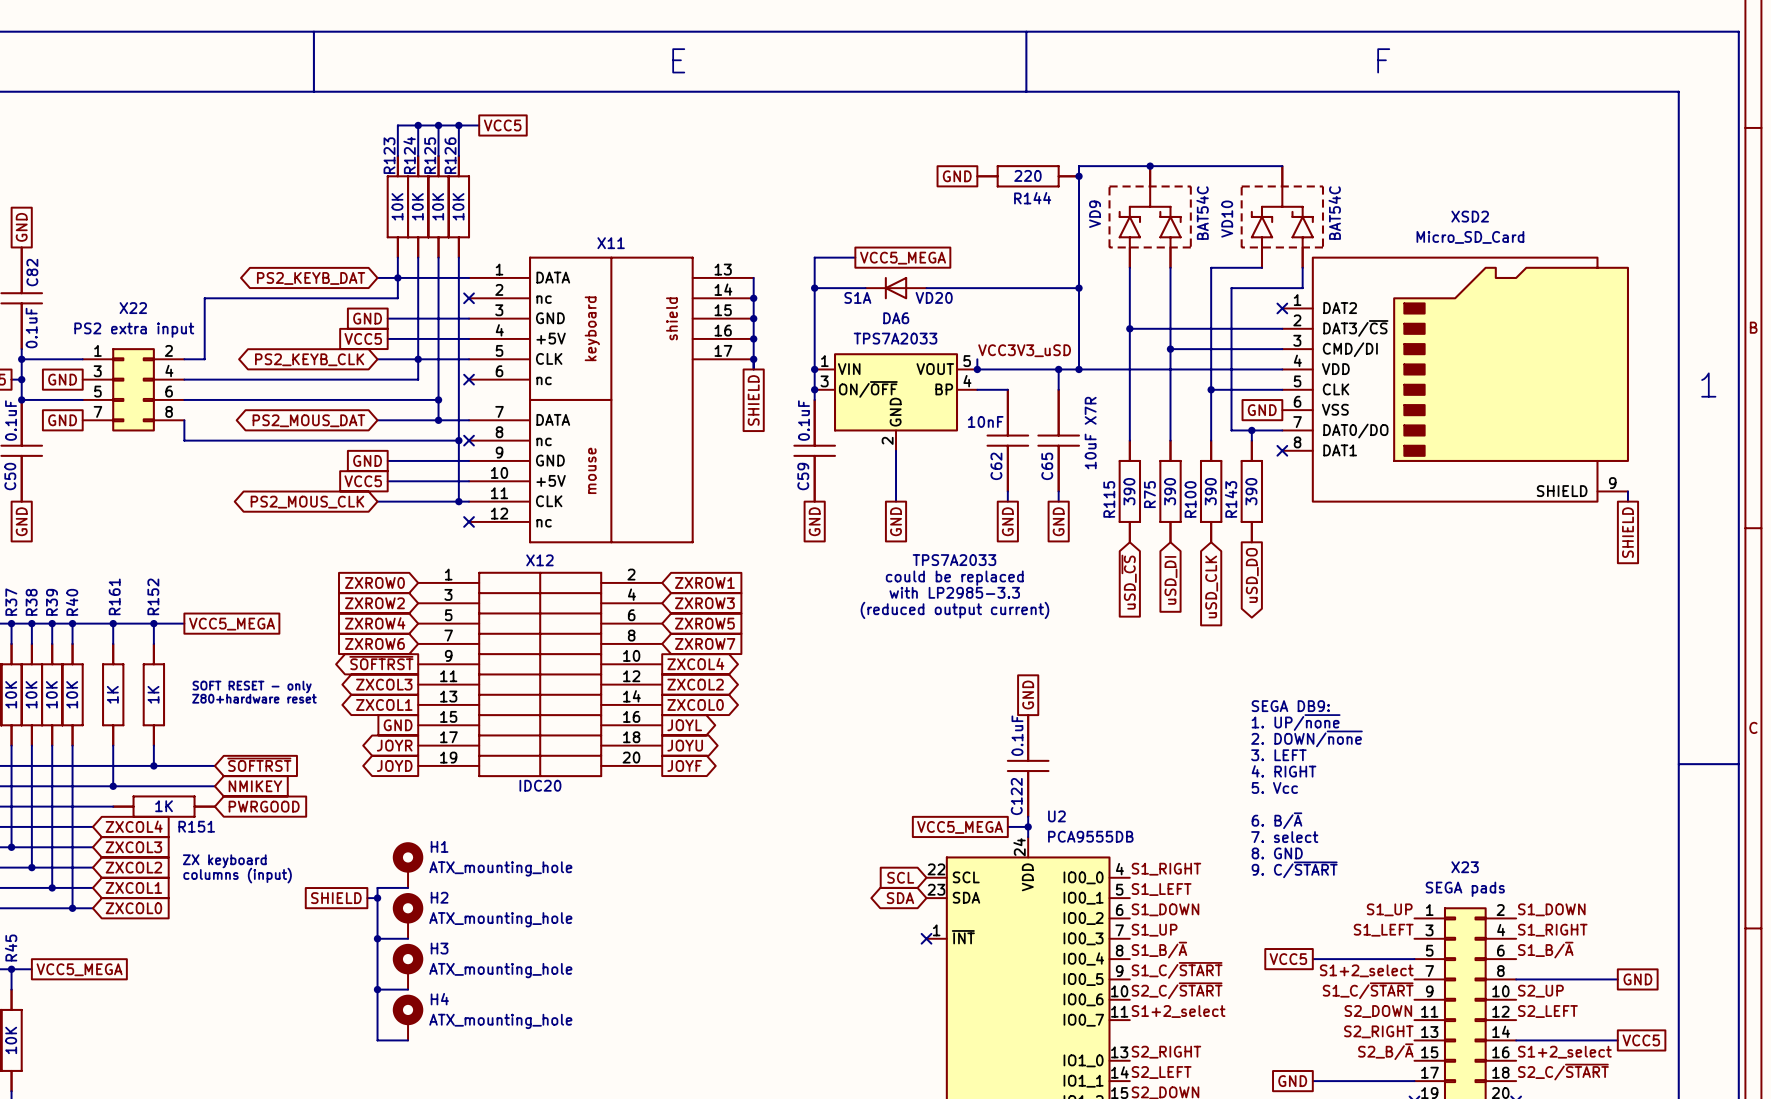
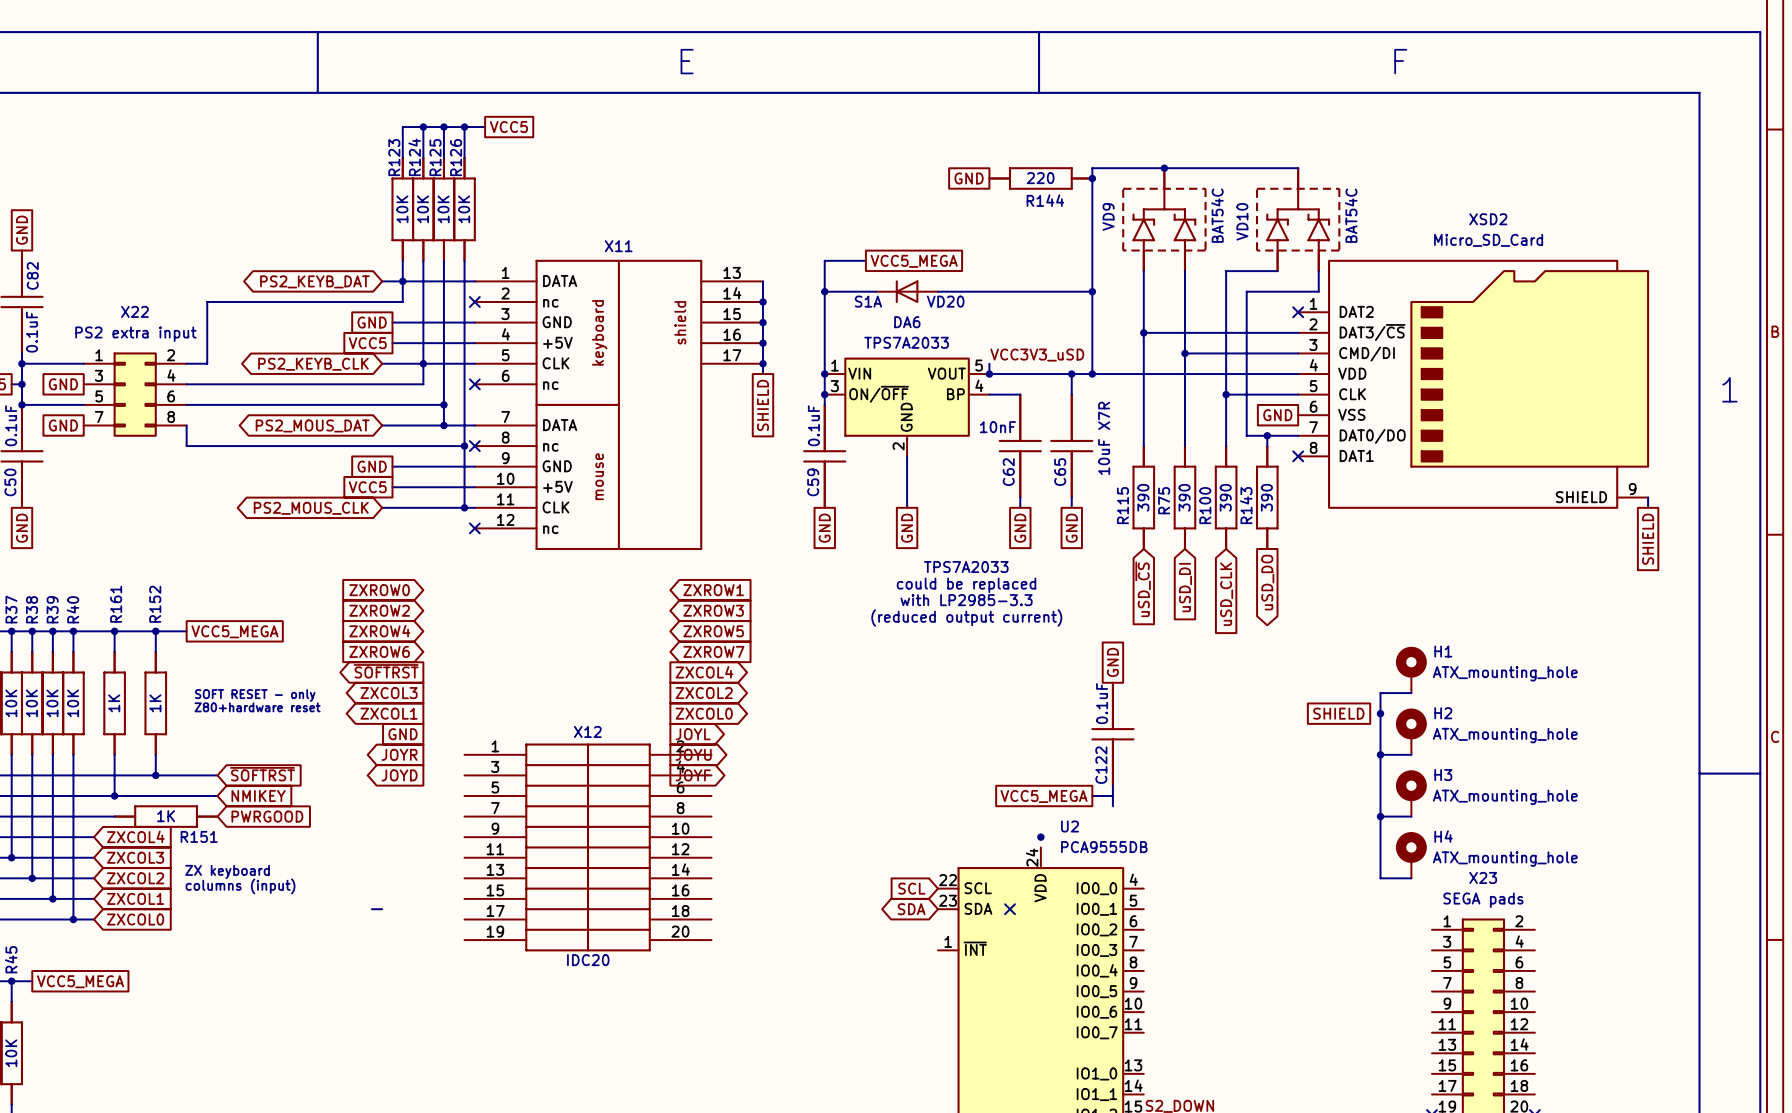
X12 position: (540, 674) -> (588, 847)
wire: none -> (1411, 693) (1380, 693) (1380, 878) (1411, 878)
global label position: GND (1028, 695) -> GND (1112, 662)
global label: none -> SHIELD (1338, 713)
junction: none -> (1380, 713)
text: SEGA DB9: (1290, 706) -> none
C122 symbol: [1006, 714, 1050, 818] -> [1091, 681, 1135, 787]
text: 1. UP/~{none} (1296, 722) -> none
text: 2. DOWN/~{none} (1306, 738) -> none
wire: none -> (1380, 754) (1411, 754)
junction: none -> (1380, 754)
text: 3. LEFT (1278, 755) -> none
text: 4. RIGHT (1284, 771) -> none
text: 5. Vcc (1274, 787) -> none
wire: none -> (1380, 816) (1411, 816)
junction: none -> (1380, 816)
wire: (1028, 816) (1028, 837) -> (1112, 785) (1112, 806)
text: 6. B/~{A} (1276, 820) -> none
wire: (1007, 826) (1028, 826) -> (1092, 795) (1112, 795)
global label position: VCC5_MEGA (960, 827) -> VCC5_MEGA (1044, 796)
text: 7. select (1284, 837) -> none
text: 8. GND (1277, 853) -> none
H1 position: (408, 865) -> (1411, 669)
label: S1_RIGHT (1166, 869) -> none
text: 9. C/~{START} (1294, 869) -> none
wire: (408, 887) (377, 887) (377, 1040) (408, 1040) -> none
label: S1_LEFT (1161, 889) -> none
global label: SHIELD (336, 898) -> none
junction: (377, 898) -> none
no-connect mark: none -> (1010, 909)
label: S1_DOWN (1165, 909) -> none
label: S1_UP (1389, 909) -> none
label: S1_DOWN (1551, 909) -> none
H2 position: (408, 915) -> (1411, 731)
label: S1_UP (1154, 930) -> none
label: S1_LEFT (1383, 930) -> none
label: S1_RIGHT (1552, 930) -> none
wire: (377, 938) (408, 938) -> none
junction: (377, 938) -> none
no-connect mark: (926, 938) -> none
label: S1_B/~{A} (1159, 950) -> none
label: S1_B/~{A} (1545, 950) -> none
global label: VCC5 (1288, 959) -> none
wire: (1312, 959) (1414, 959) -> none
H3 position: (408, 966) -> (1411, 793)
label: S1_C/~{START} (1177, 970) -> none
label: S1+2_select (1366, 970) -> none
wire: (1516, 979) (1617, 979) -> none
global label: GND (1637, 979) -> none
wire: (377, 989) (408, 989) -> none
junction: (377, 989) -> none
label: S2_C/~{START} (1177, 990) -> none
label: S1_C/~{START} (1368, 990) -> none
label: S2_UP (1540, 991) -> none
label: S1+2_select (1178, 1011) -> none
label: S2_DOWN (1378, 1011) -> none
label: S2_LEFT (1547, 1011) -> none
H4 position: (408, 1017) -> (1411, 855)
label: S2_RIGHT (1378, 1031) -> none
wire: (1516, 1040) (1617, 1040) -> none
global label: VCC5 (1641, 1040) -> none
label: S2_B/~{A} (1385, 1051) -> none
label: S2_RIGHT (1166, 1052) -> none
label: S1+2_select (1564, 1052) -> none
label: S2_LEFT (1161, 1072) -> none
label: S2_C/~{START} (1563, 1072) -> none
global label: GND (1292, 1081) -> none
wire: (1312, 1081) (1414, 1081) -> none

